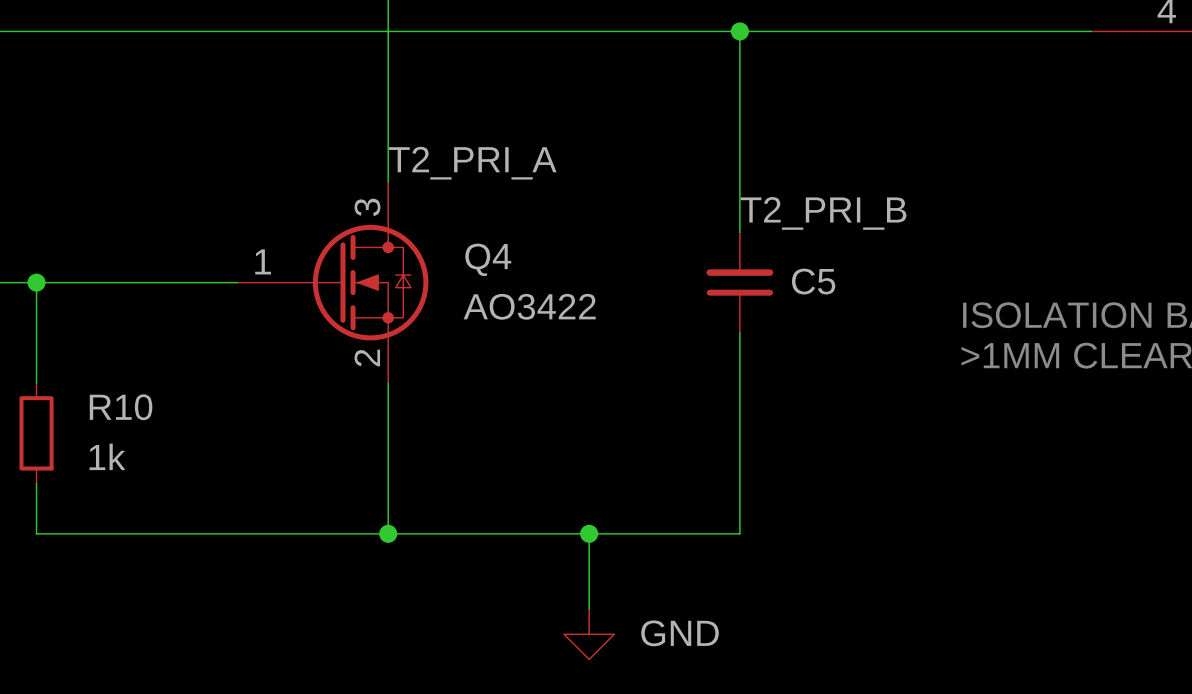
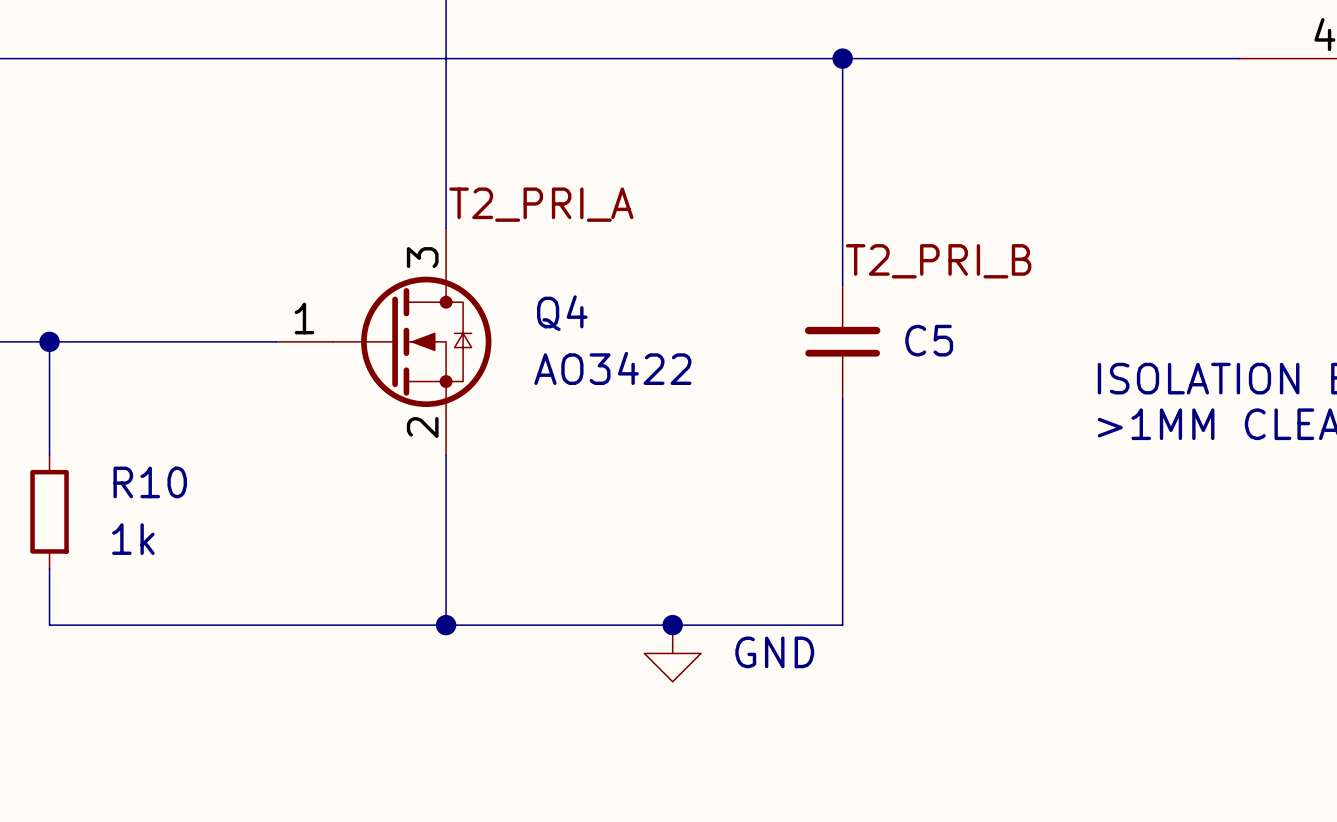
wire: (589, 533) (589, 609) -> none
power symbol position: GND (589, 634) -> GND (672, 653)

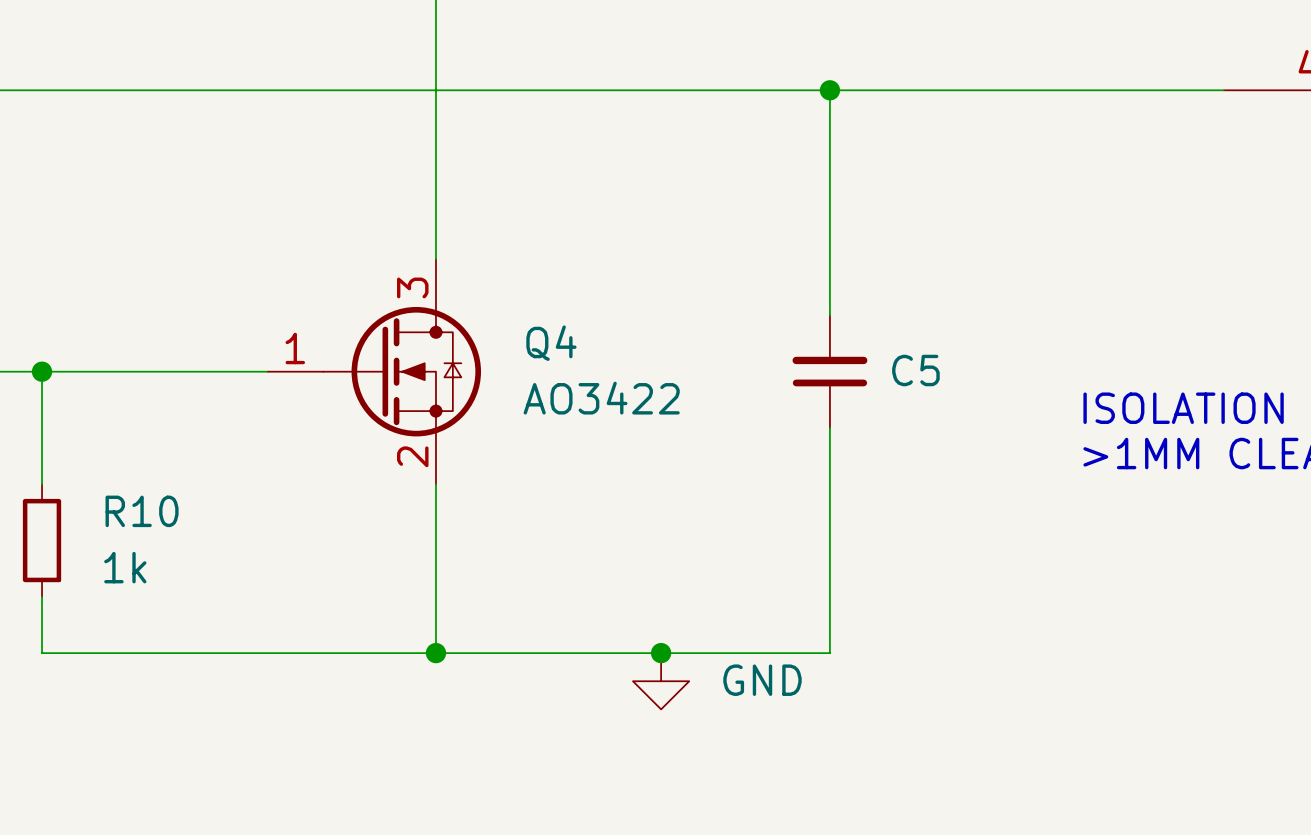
label: T2_PRI_A (541, 204) -> none
label: T2_PRI_B (938, 261) -> none

